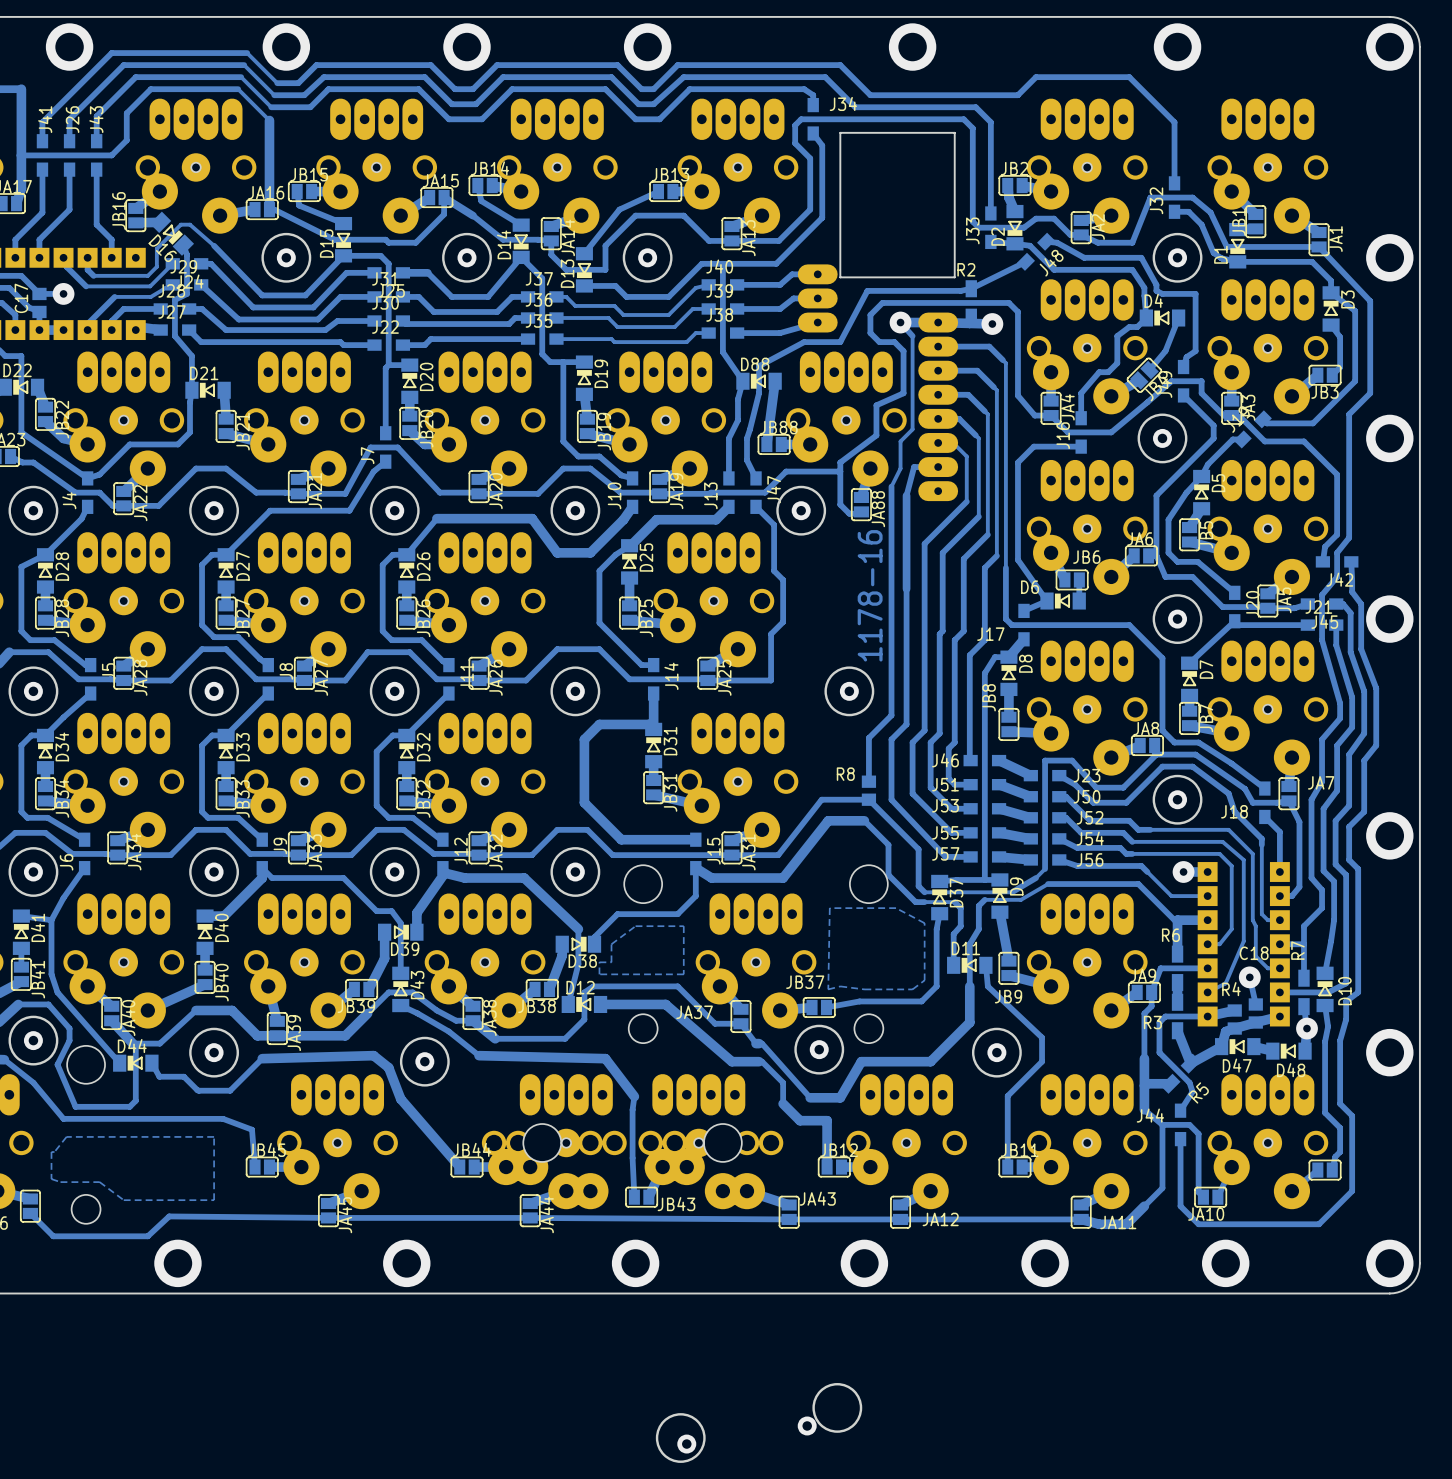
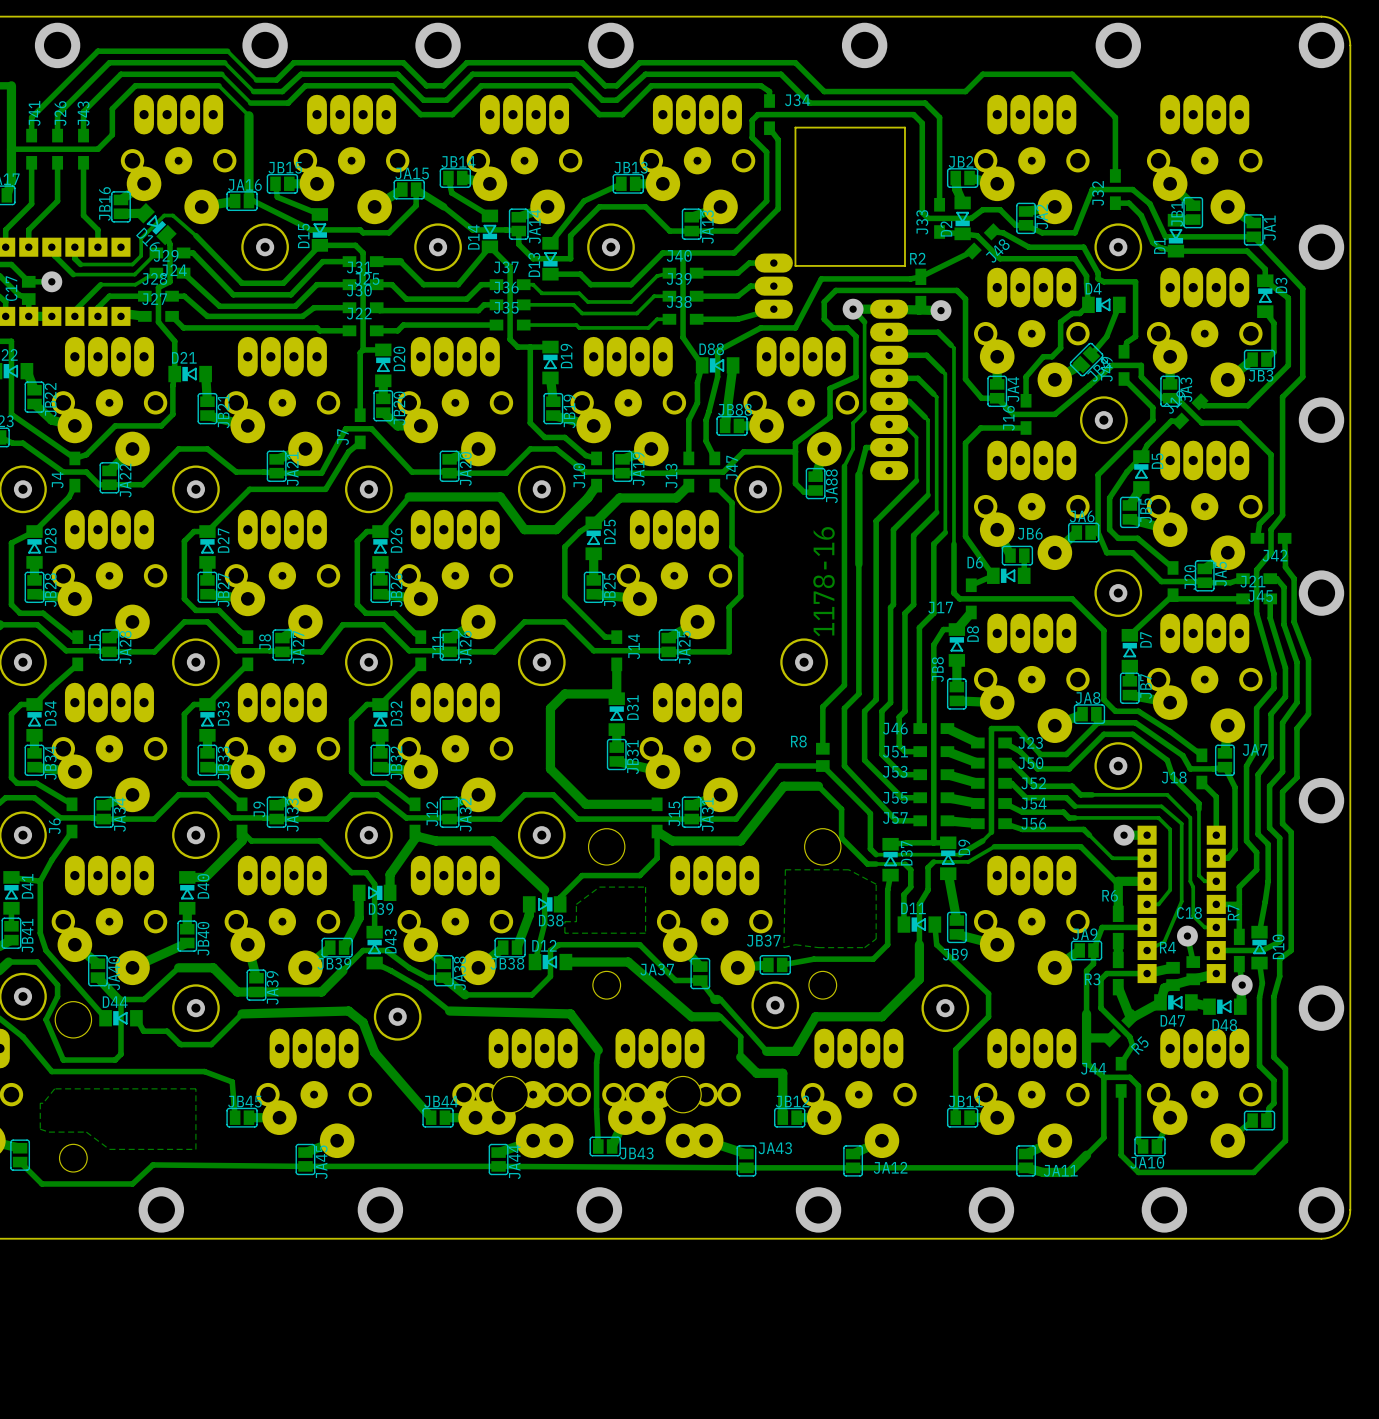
round board edge: [812, 1383, 863, 1433] -> none
round board edge: [655, 1413, 706, 1463] -> none
via: (807, 1425) -> none
via: (686, 1444) -> none

